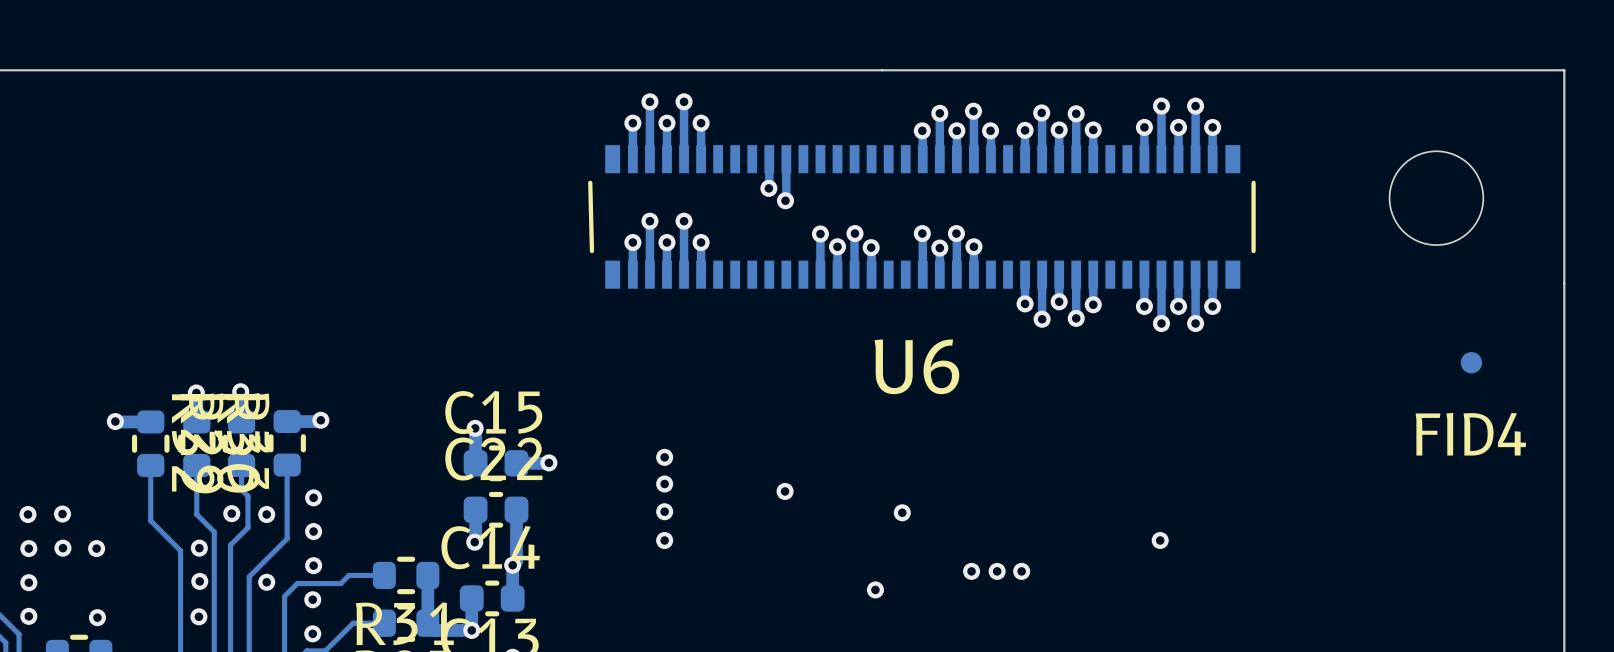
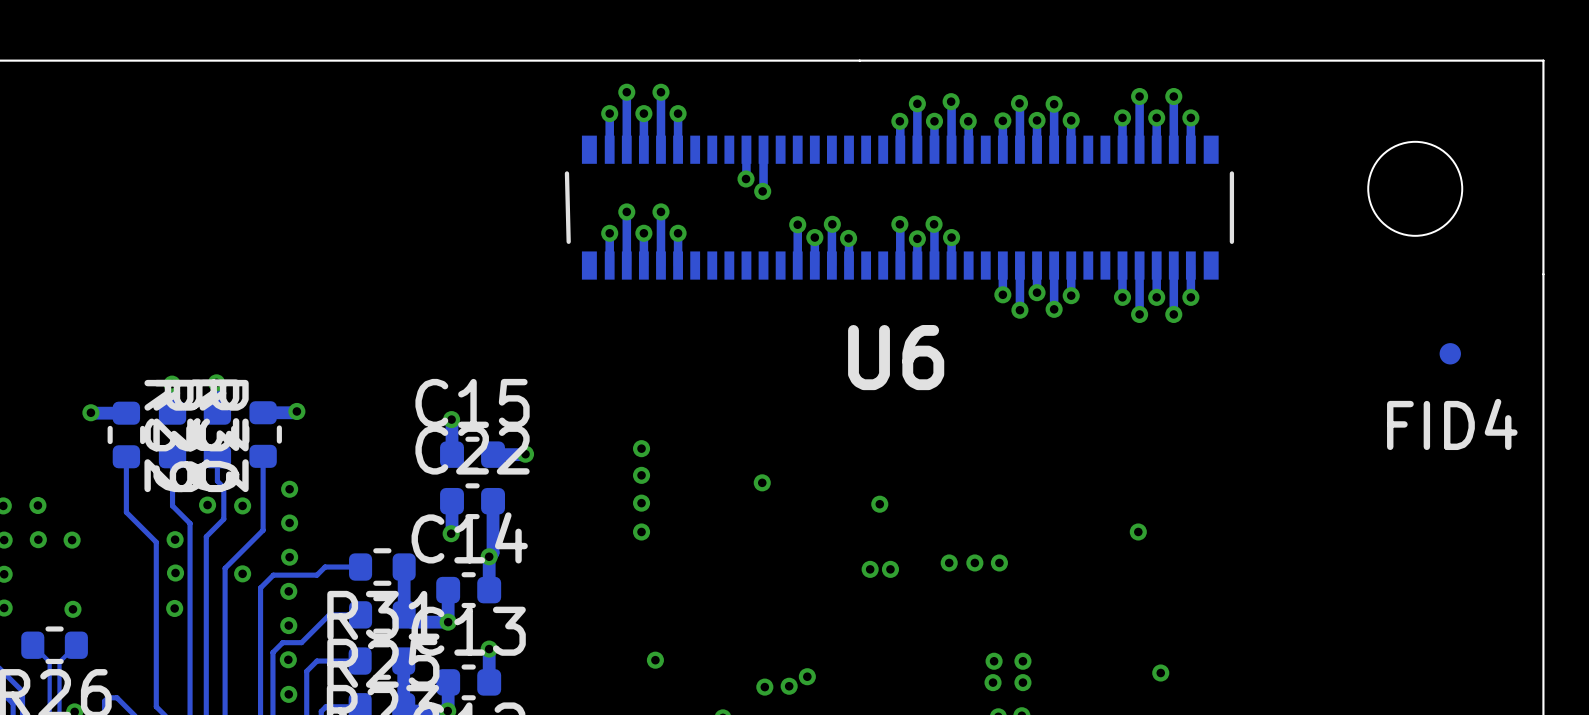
via: none -> (870, 569)
via: none -> (890, 569)
via: (875, 589) -> none

